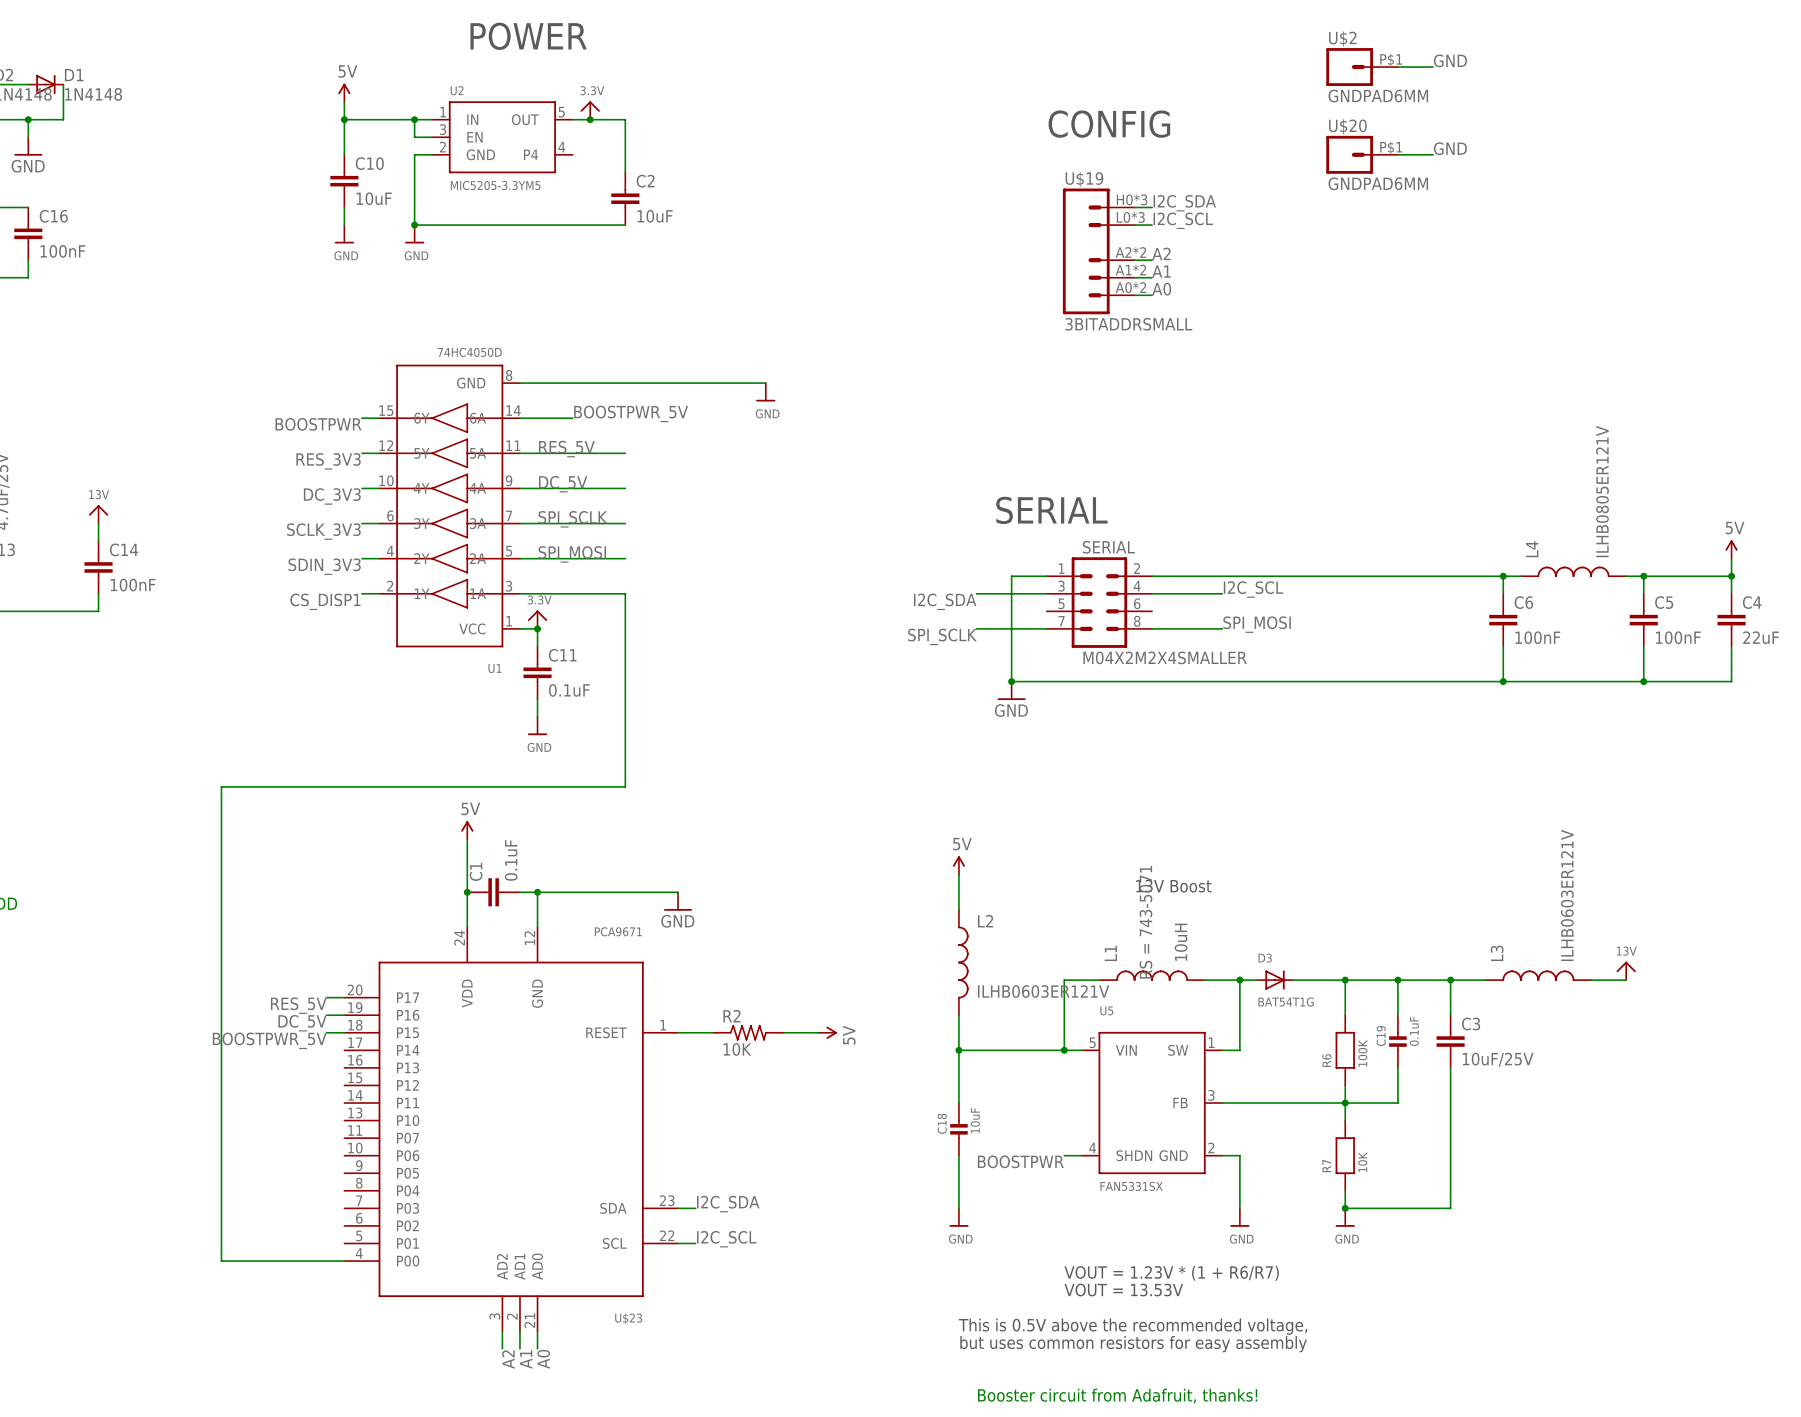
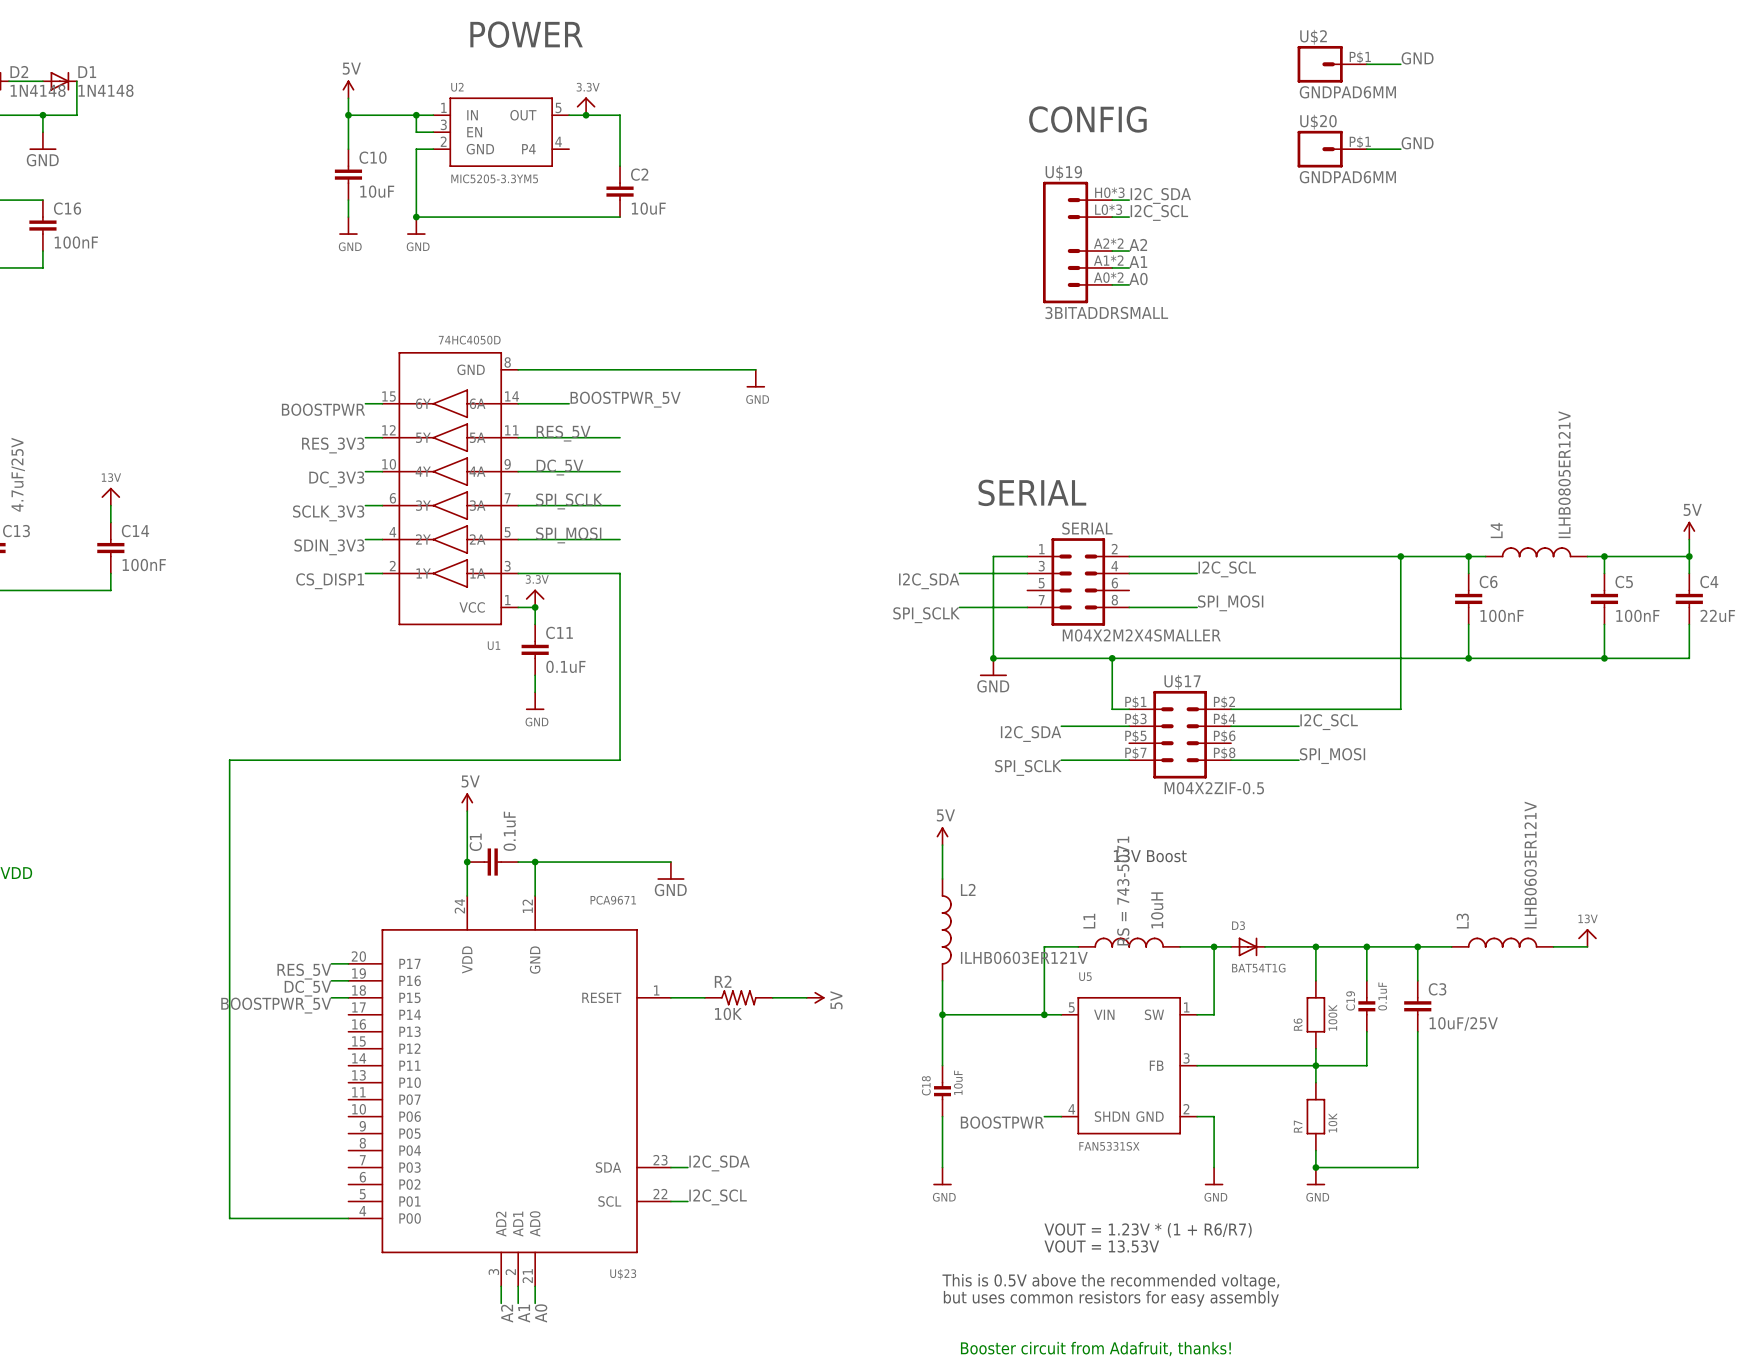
wire: none -> (1400, 556) (1400, 709) (1231, 709)
junction: none -> (1400, 556)
wire: none -> (1112, 658) (1112, 709) (1129, 709)
junction: none -> (1112, 658)
label: none -> I2C_SCL (1329, 722)
wire: none -> (1061, 726) (1129, 726)
wire: none -> (1231, 726) (1298, 726)
label: none -> I2C_SDA (1031, 734)
U$17: none -> M04X2ZIF-0.5 (1180, 734)
label: none -> SPI_MOSI (1332, 756)
wire: none -> (1061, 760) (1129, 760)
wire: none -> (1231, 760) (1298, 760)
label: none -> SPI_SCLK (1028, 767)

